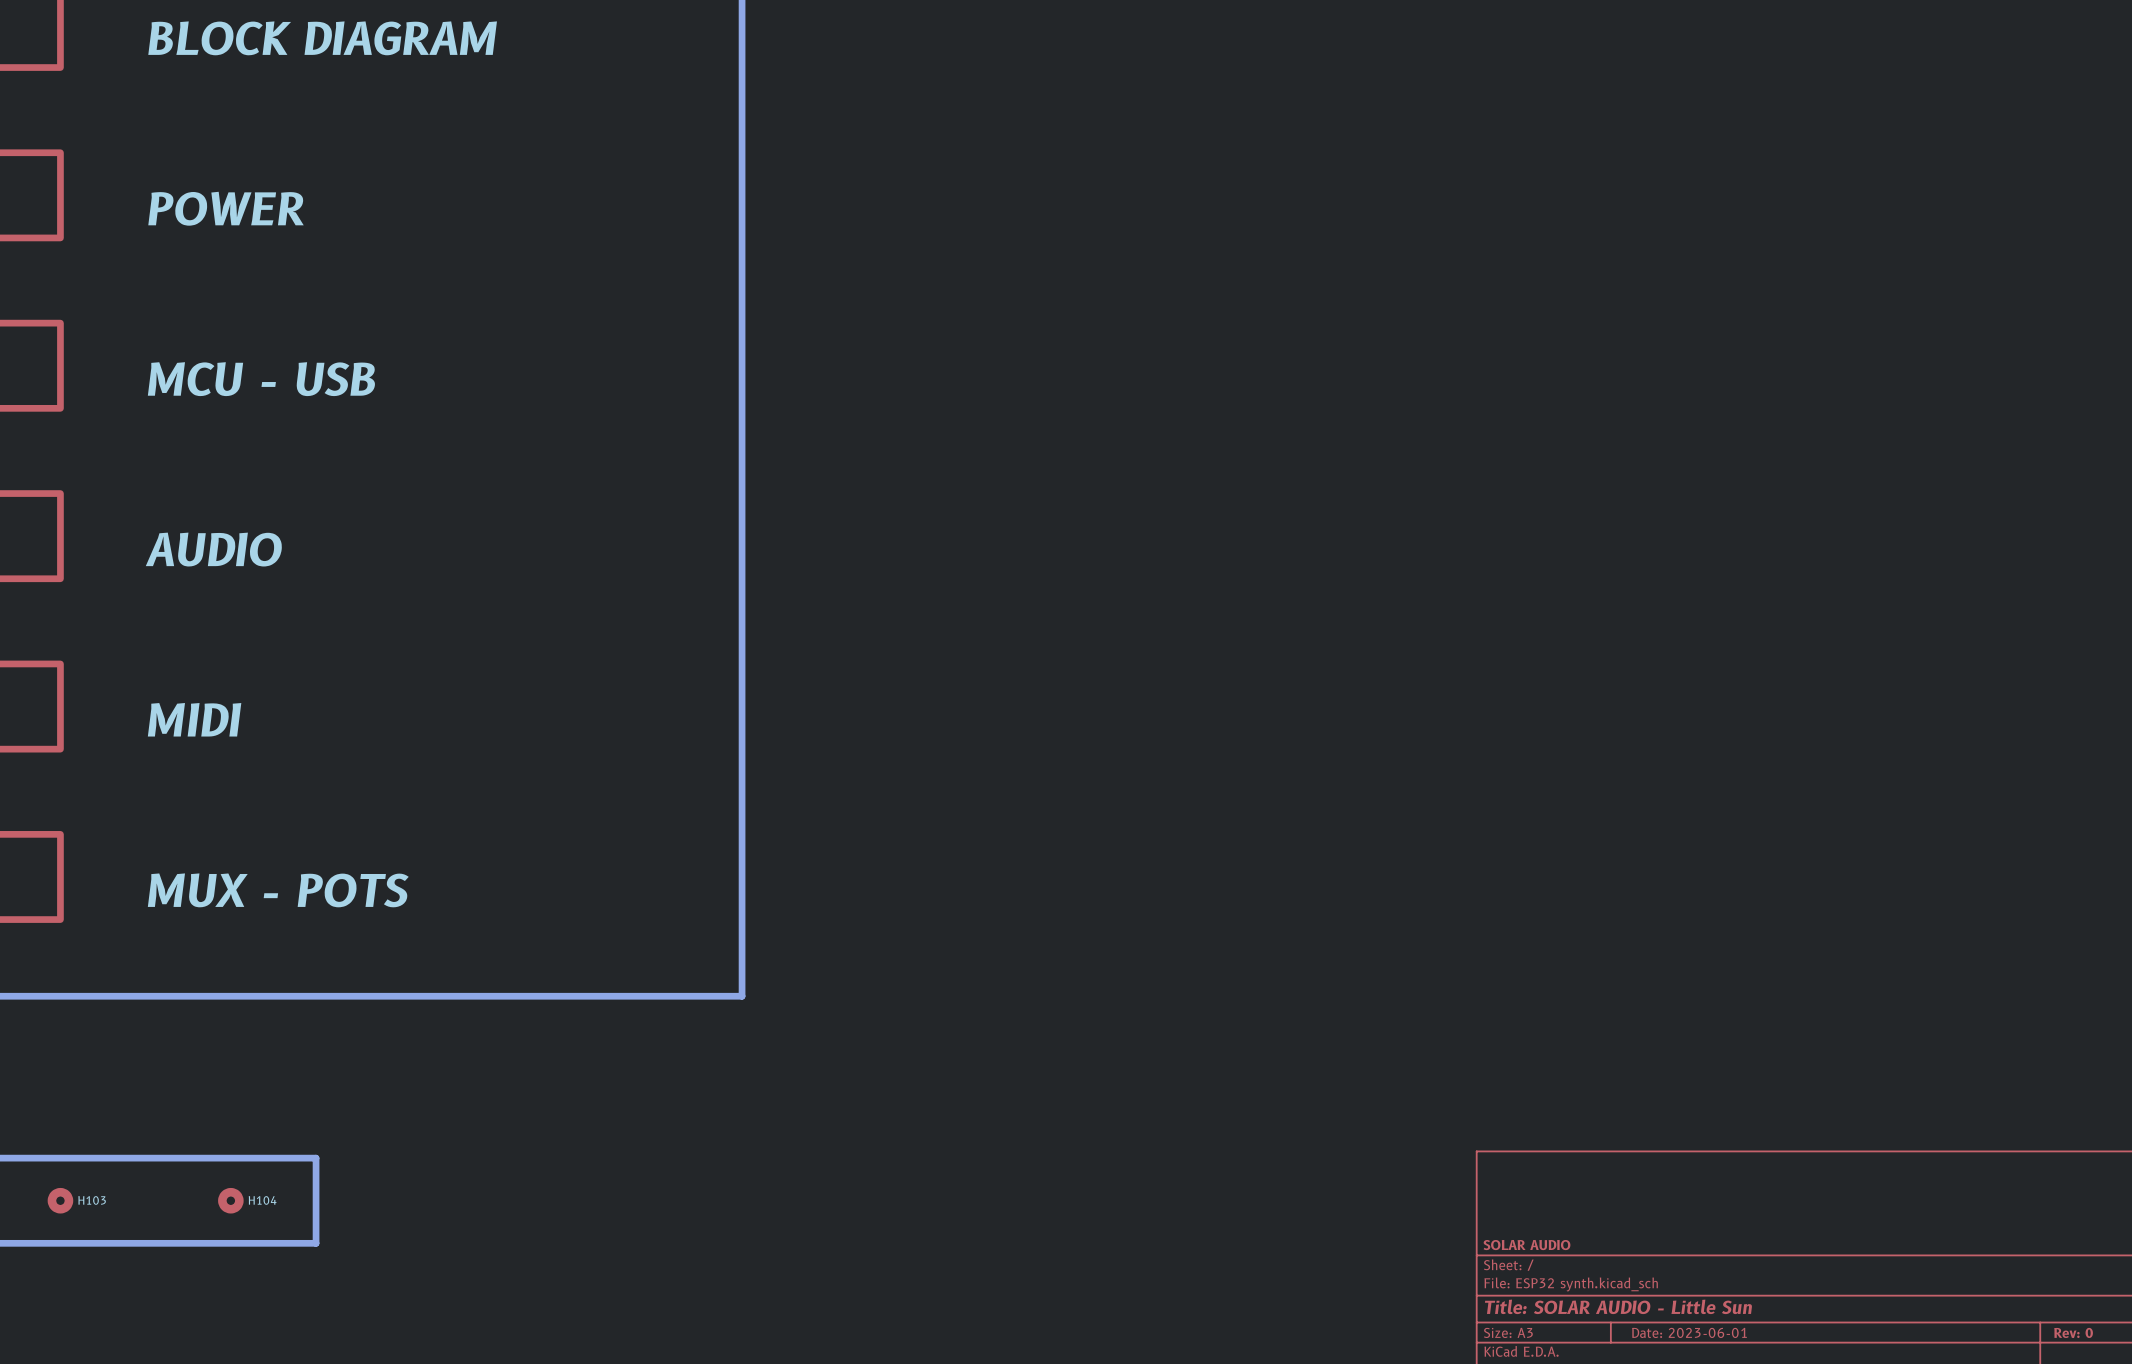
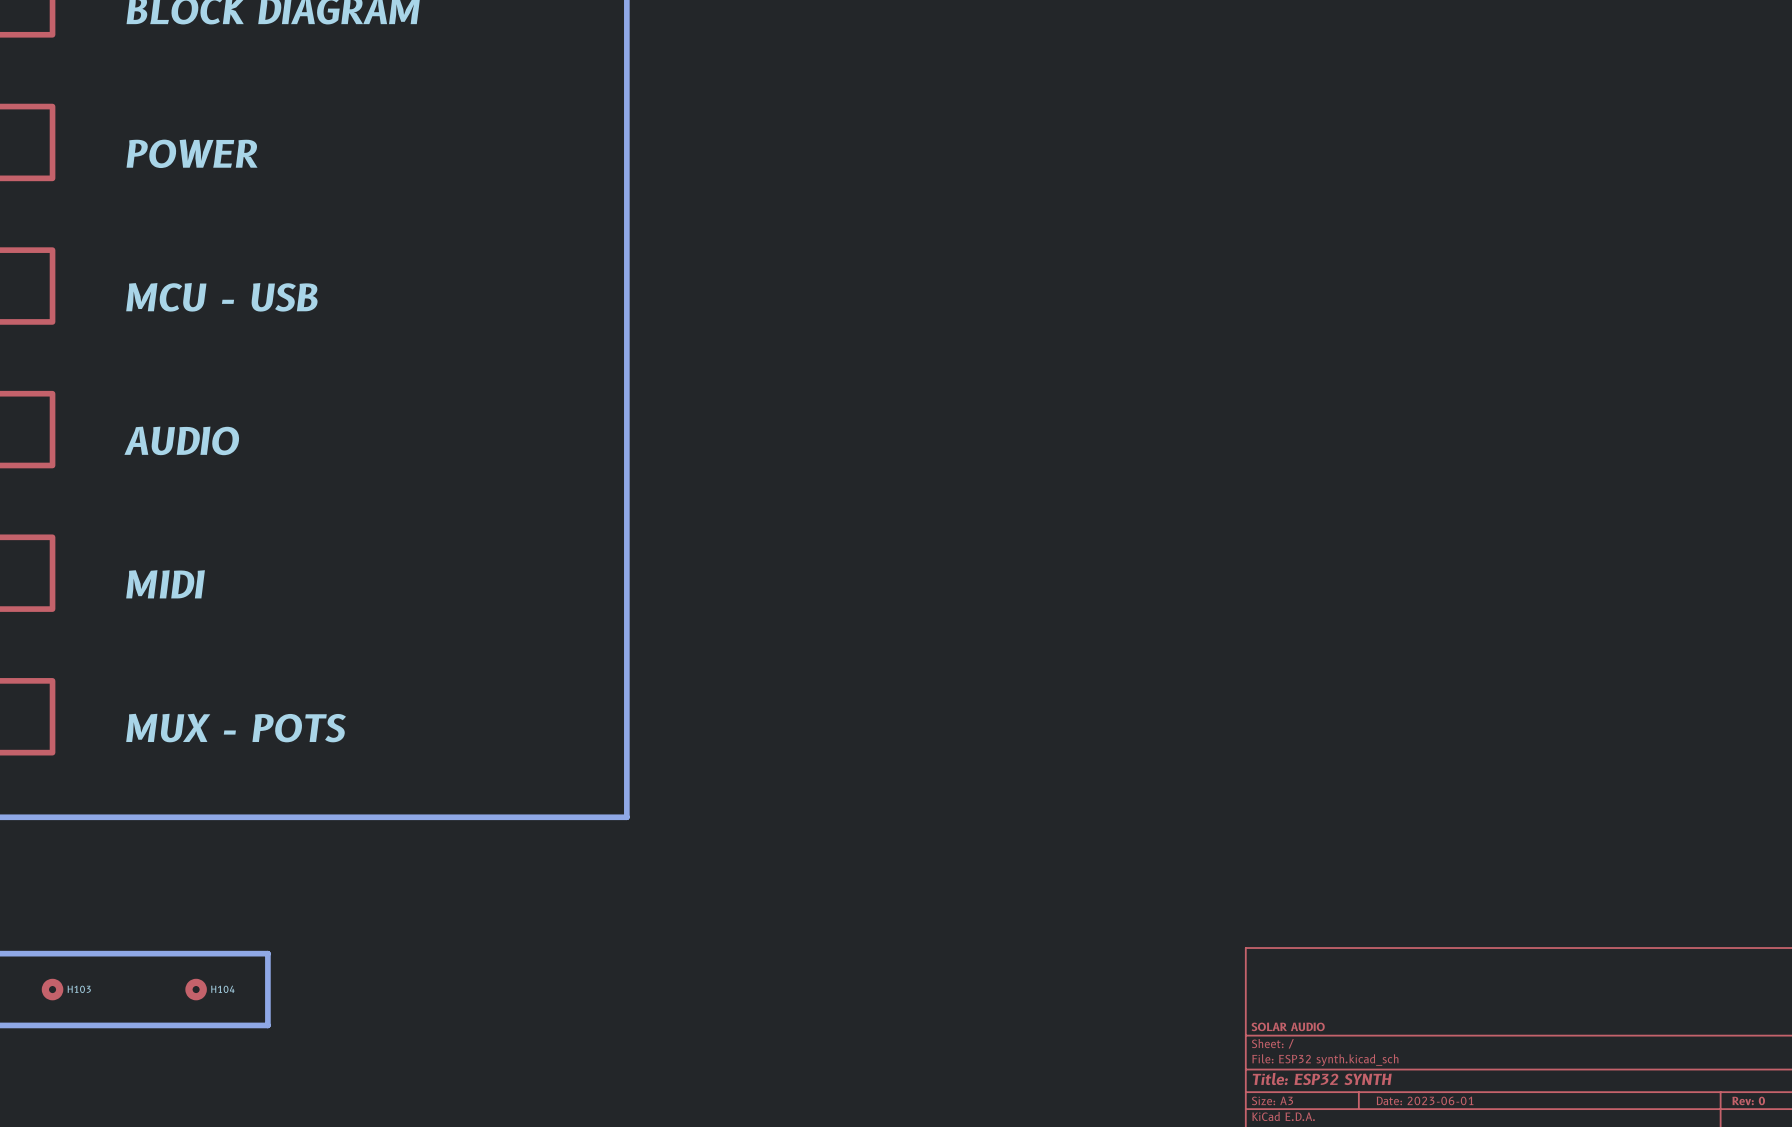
title block: Title: SOLAR AUDIO - Little Sun (1618, 1306) -> Title: ESP32 SYNTH (1322, 1078)

